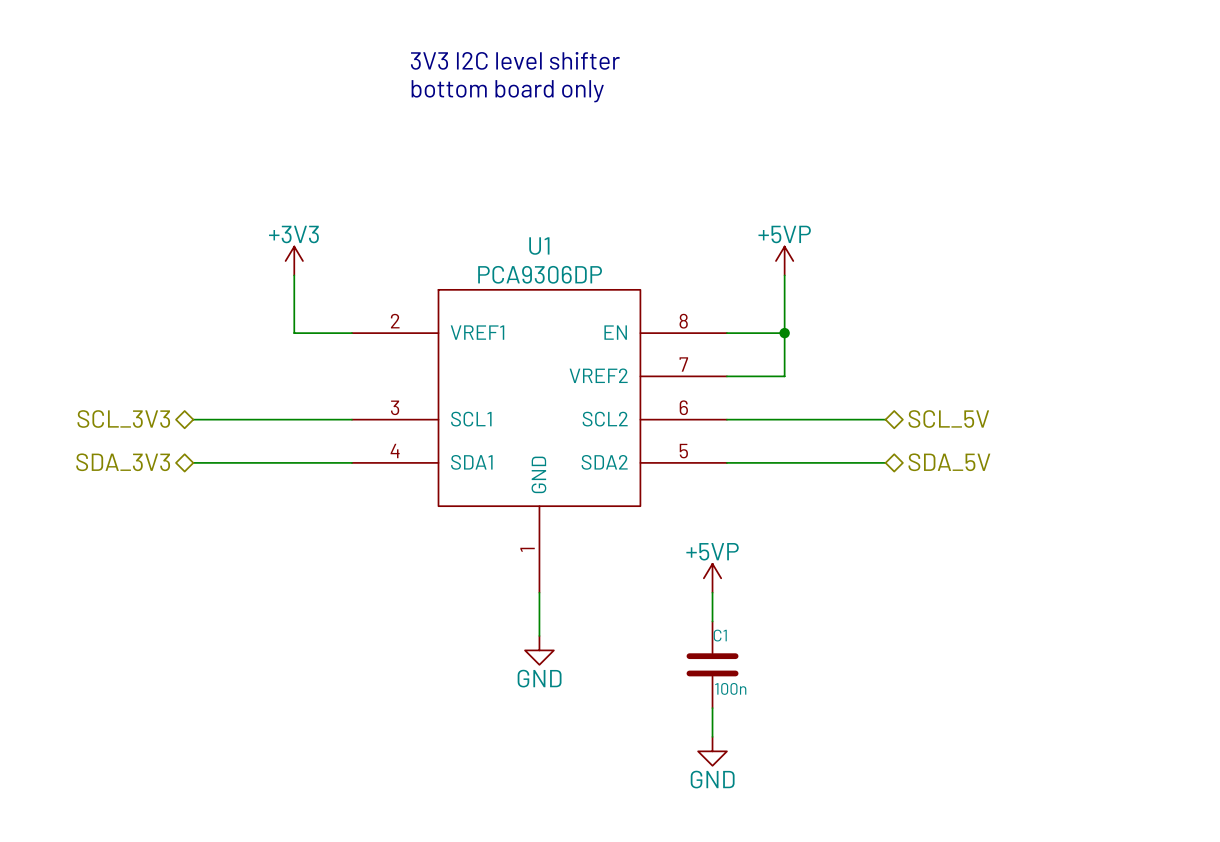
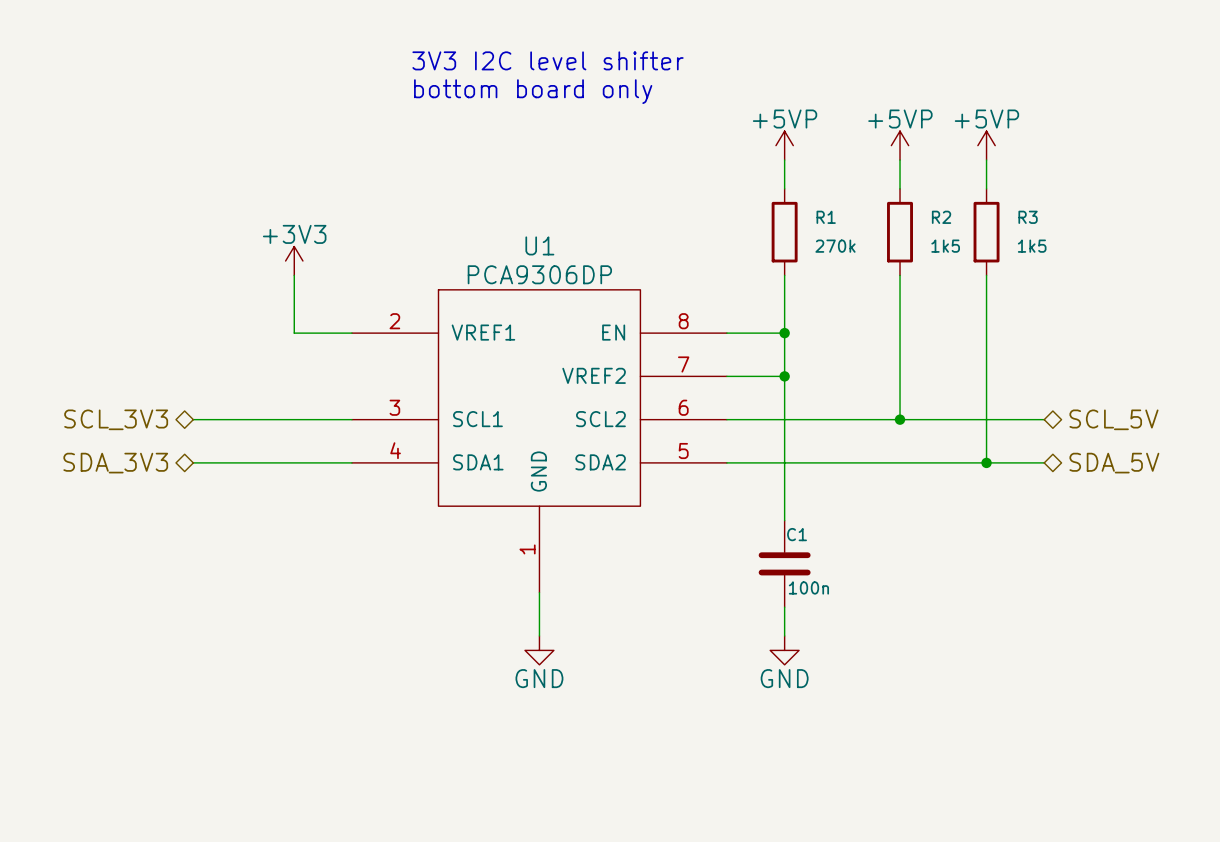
power symbol: none -> +5VP (784, 145)
power symbol: none -> +5VP (900, 145)
power symbol: none -> +5VP (986, 145)
wire: none -> (784, 160) (784, 188)
wire: none -> (900, 160) (900, 188)
wire: none -> (986, 160) (986, 188)
R1: none -> 270k (784, 232)
R2: none -> 1k5 (900, 232)
R3: none -> 1k5 (986, 232)
power symbol: +5VP (784, 261) -> none
wire: none -> (900, 275) (900, 419)
wire: none -> (986, 275) (986, 462)
wire: none -> (784, 376) (784, 520)
junction: none -> (784, 376)
wire: none -> (885, 419) (1044, 419)
junction: none -> (900, 419)
hierarchical label position: SCL_5V (948, 419) -> SCL_5V (1113, 419)
wire: none -> (885, 462) (1044, 462)
hierarchical label position: SDA_5V (949, 462) -> SDA_5V (1114, 463)
junction: none -> (986, 462)
power symbol: +5VP (712, 578) -> none
wire: (712, 592) (712, 621) -> (784, 607) (784, 635)
C1 position: (712, 664) -> (784, 563)
wire: (712, 708) (712, 736) -> none
power symbol position: GND (712, 751) -> GND (784, 650)

